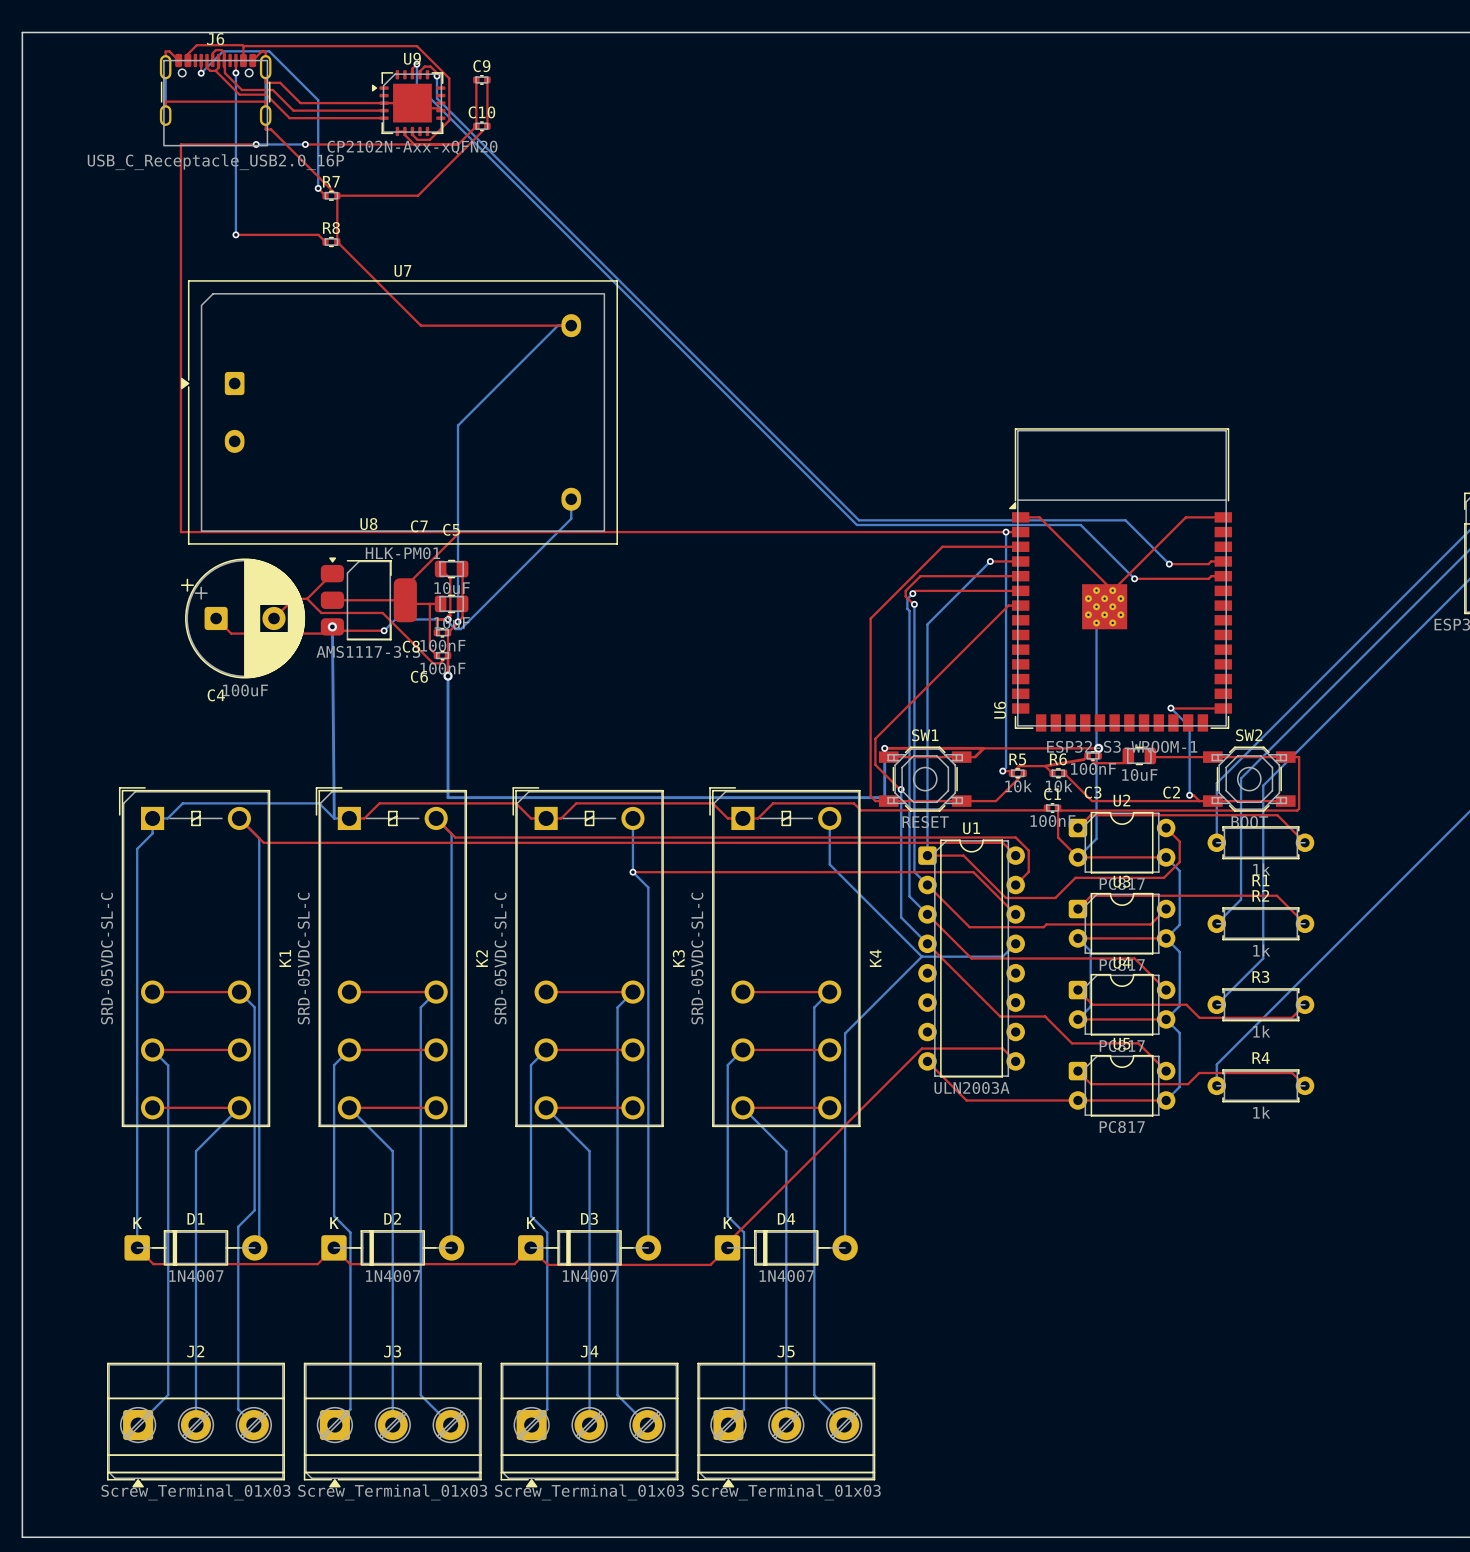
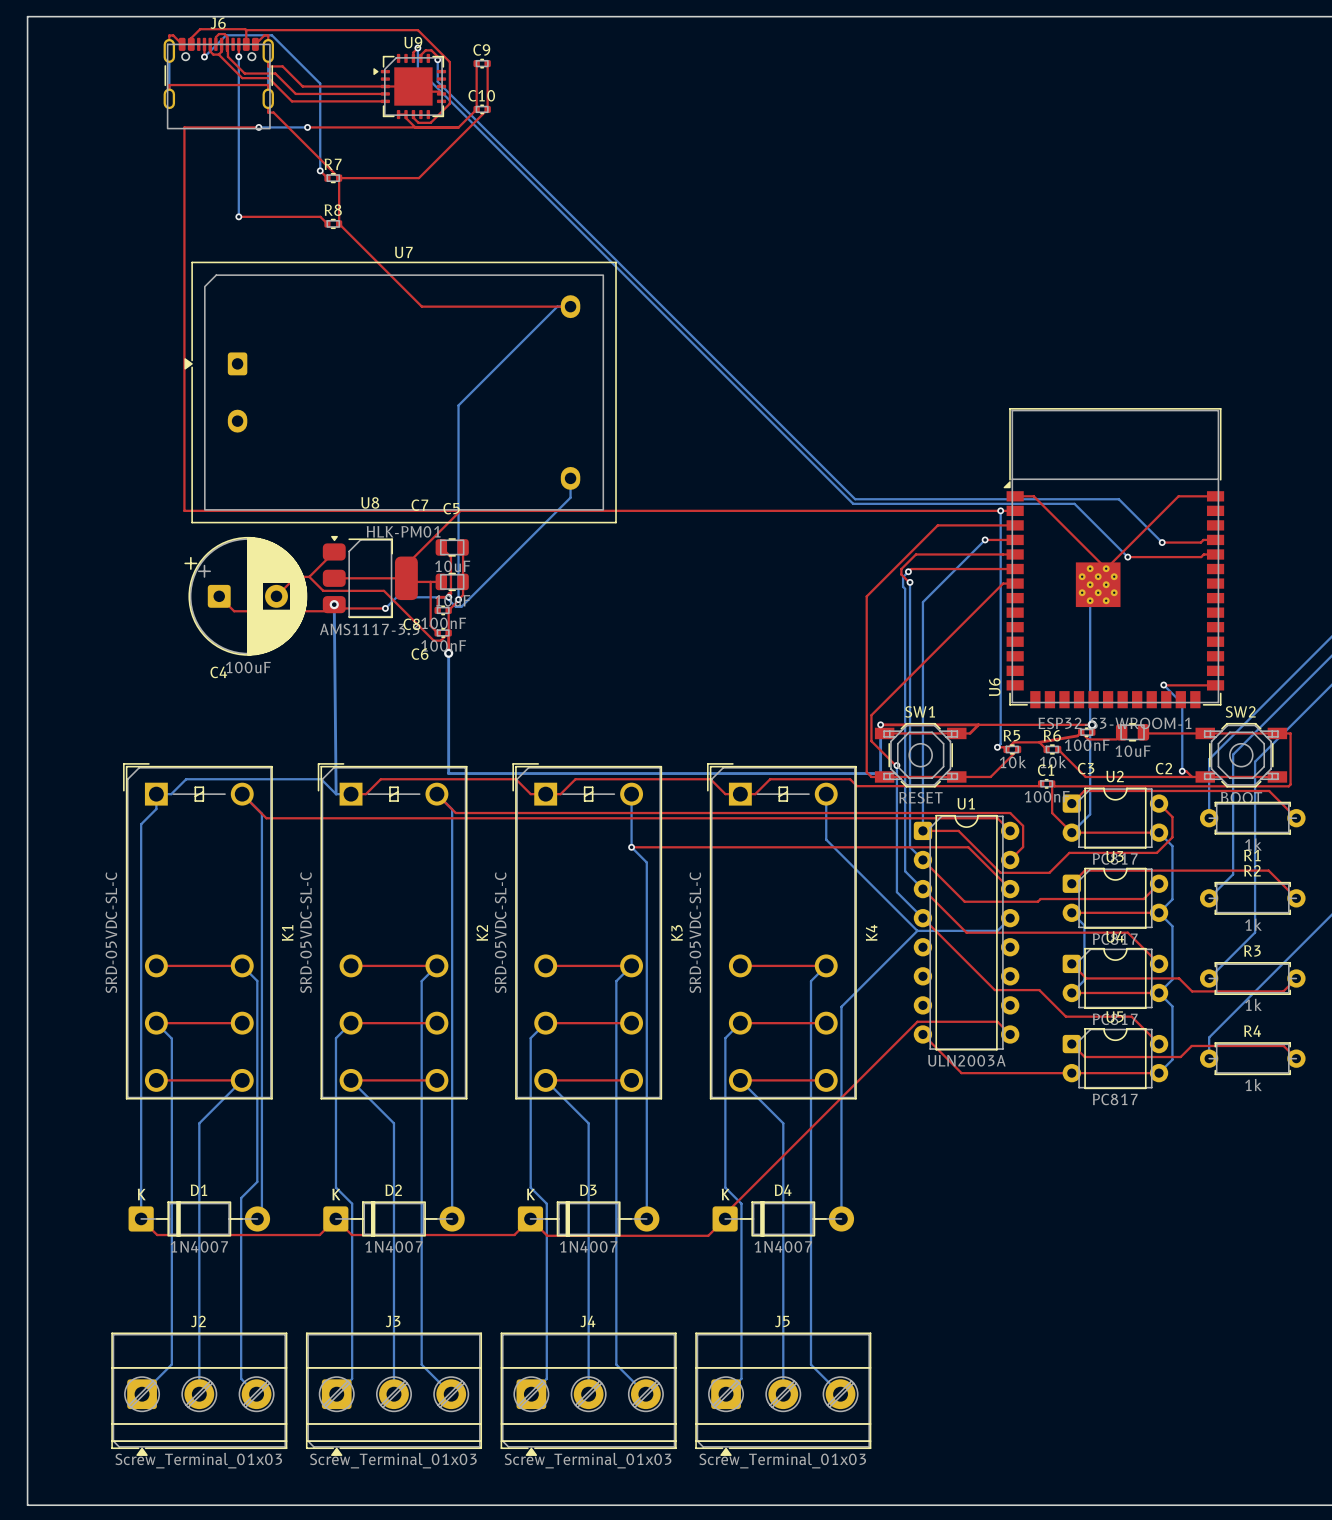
U9 value: CP2102N-Axx-xQFN20 (412, 147) -> none
J6 value: USB_C_Receptacle_USB2.0_16P (215, 162) -> none

